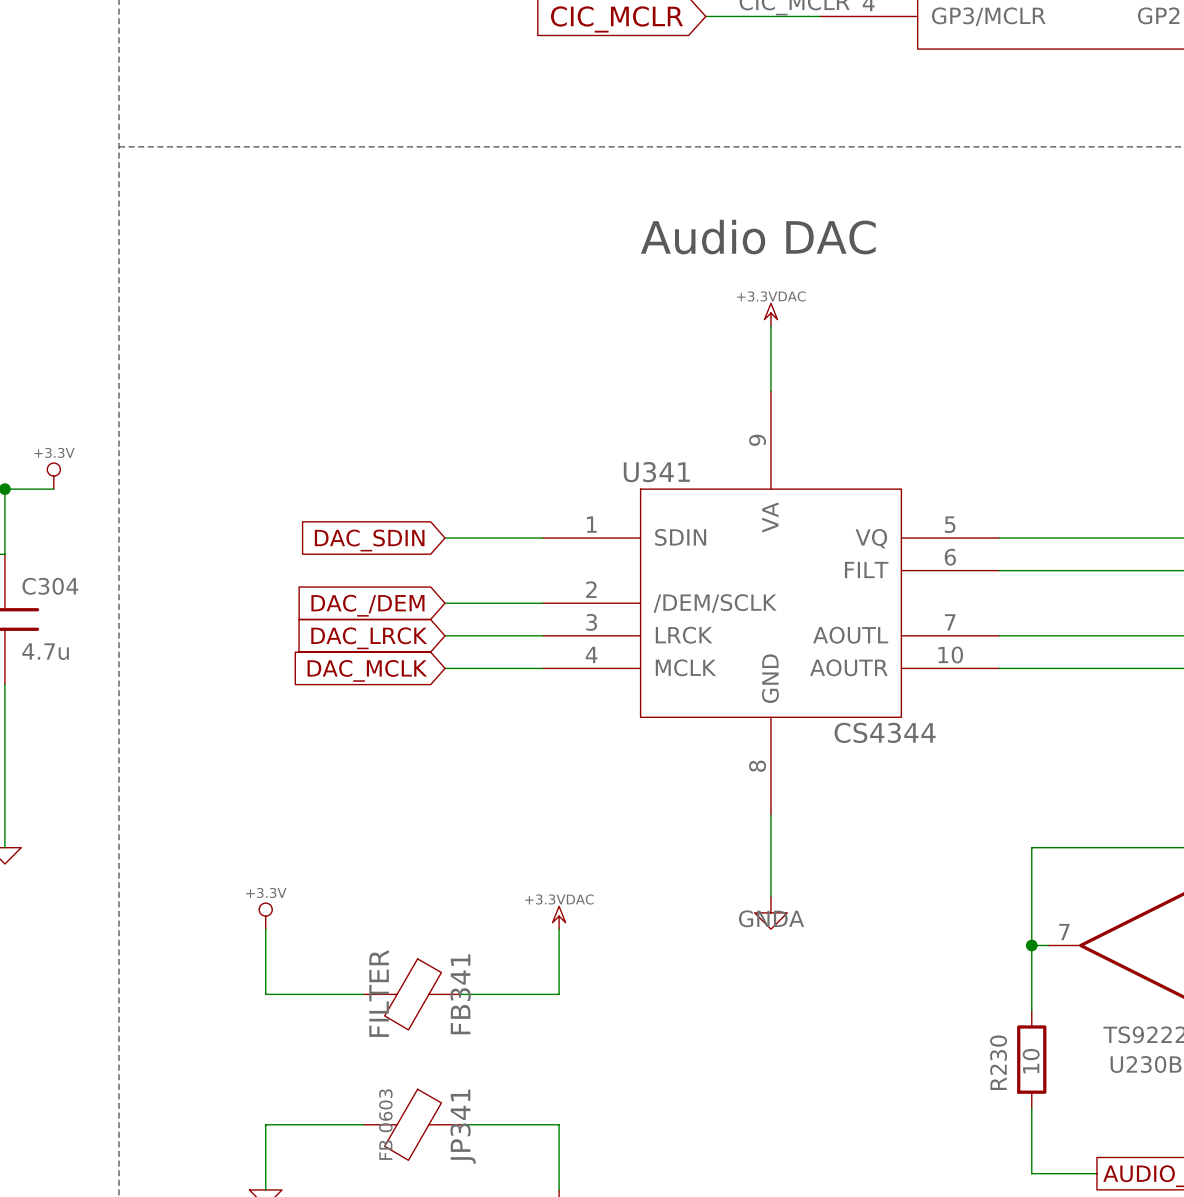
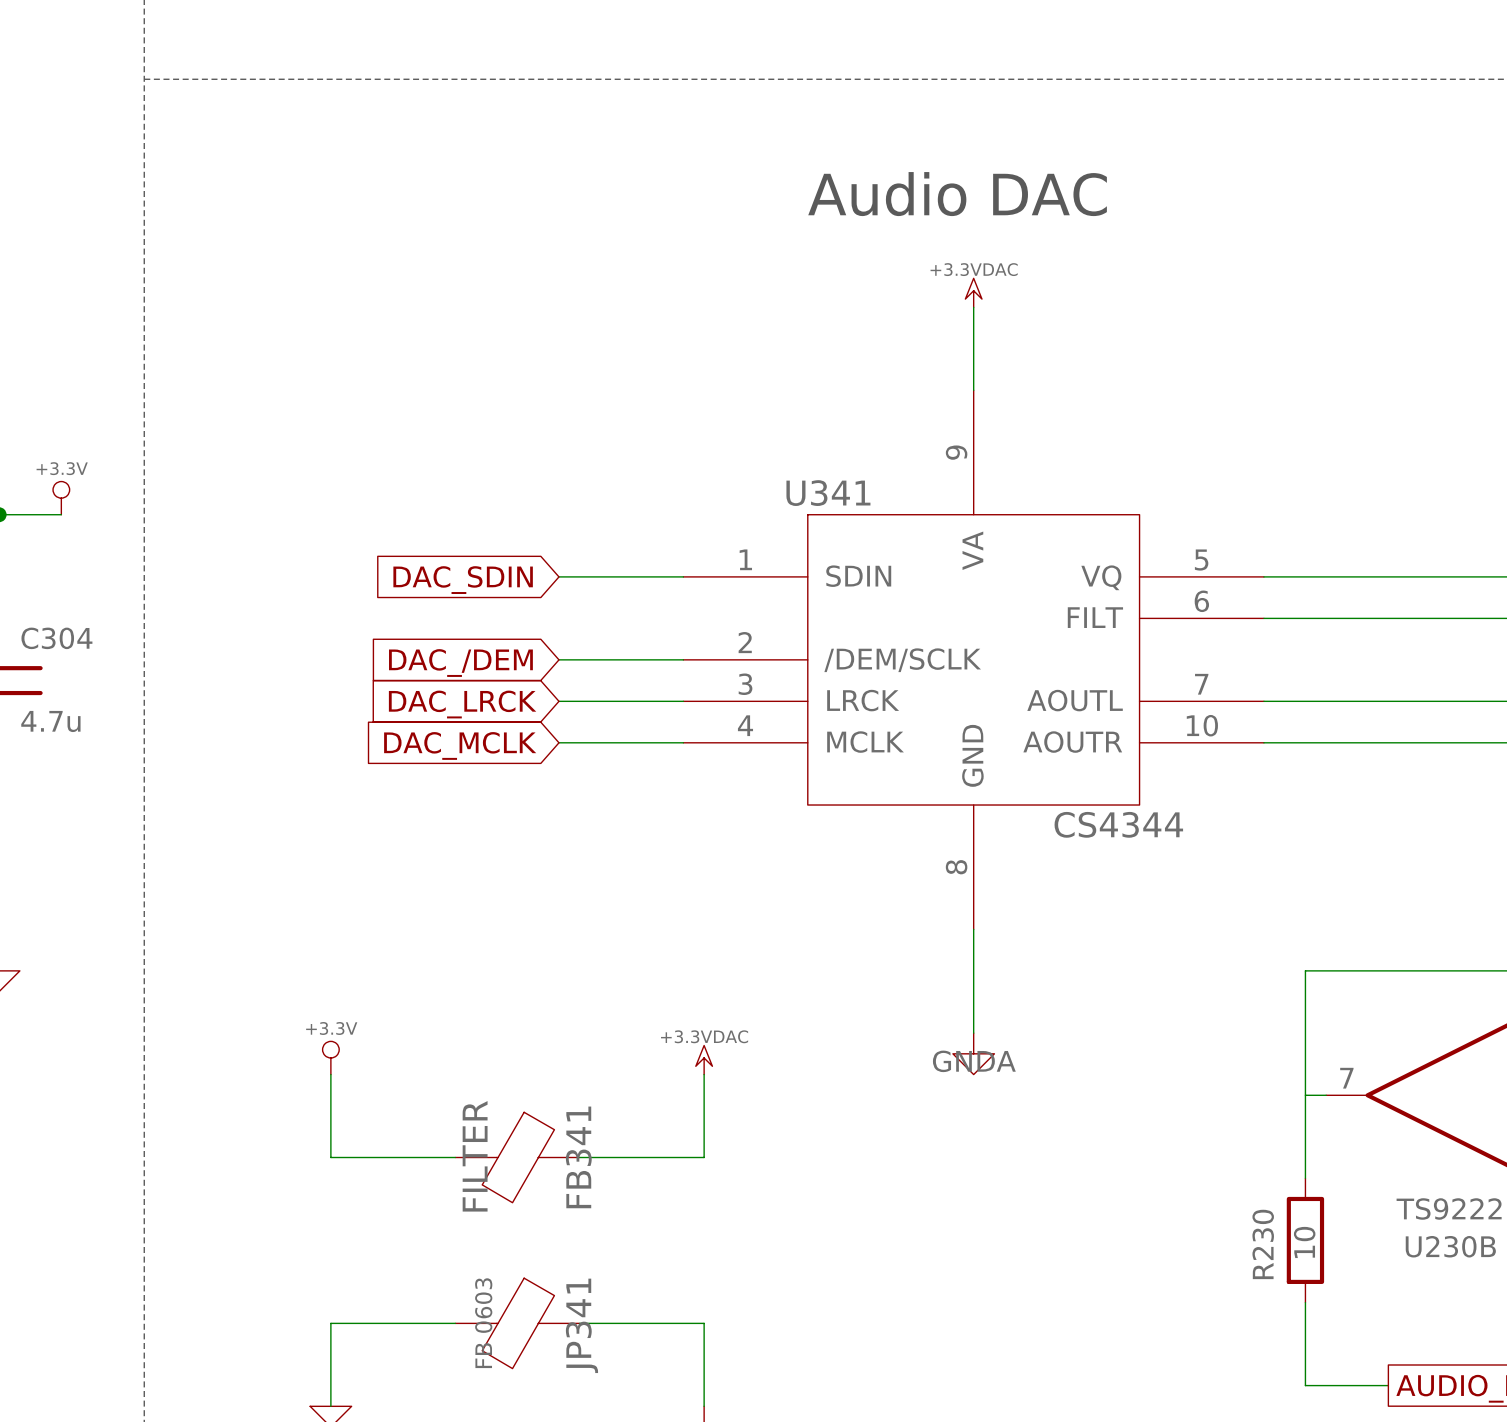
junction: (1031, 945) -> none

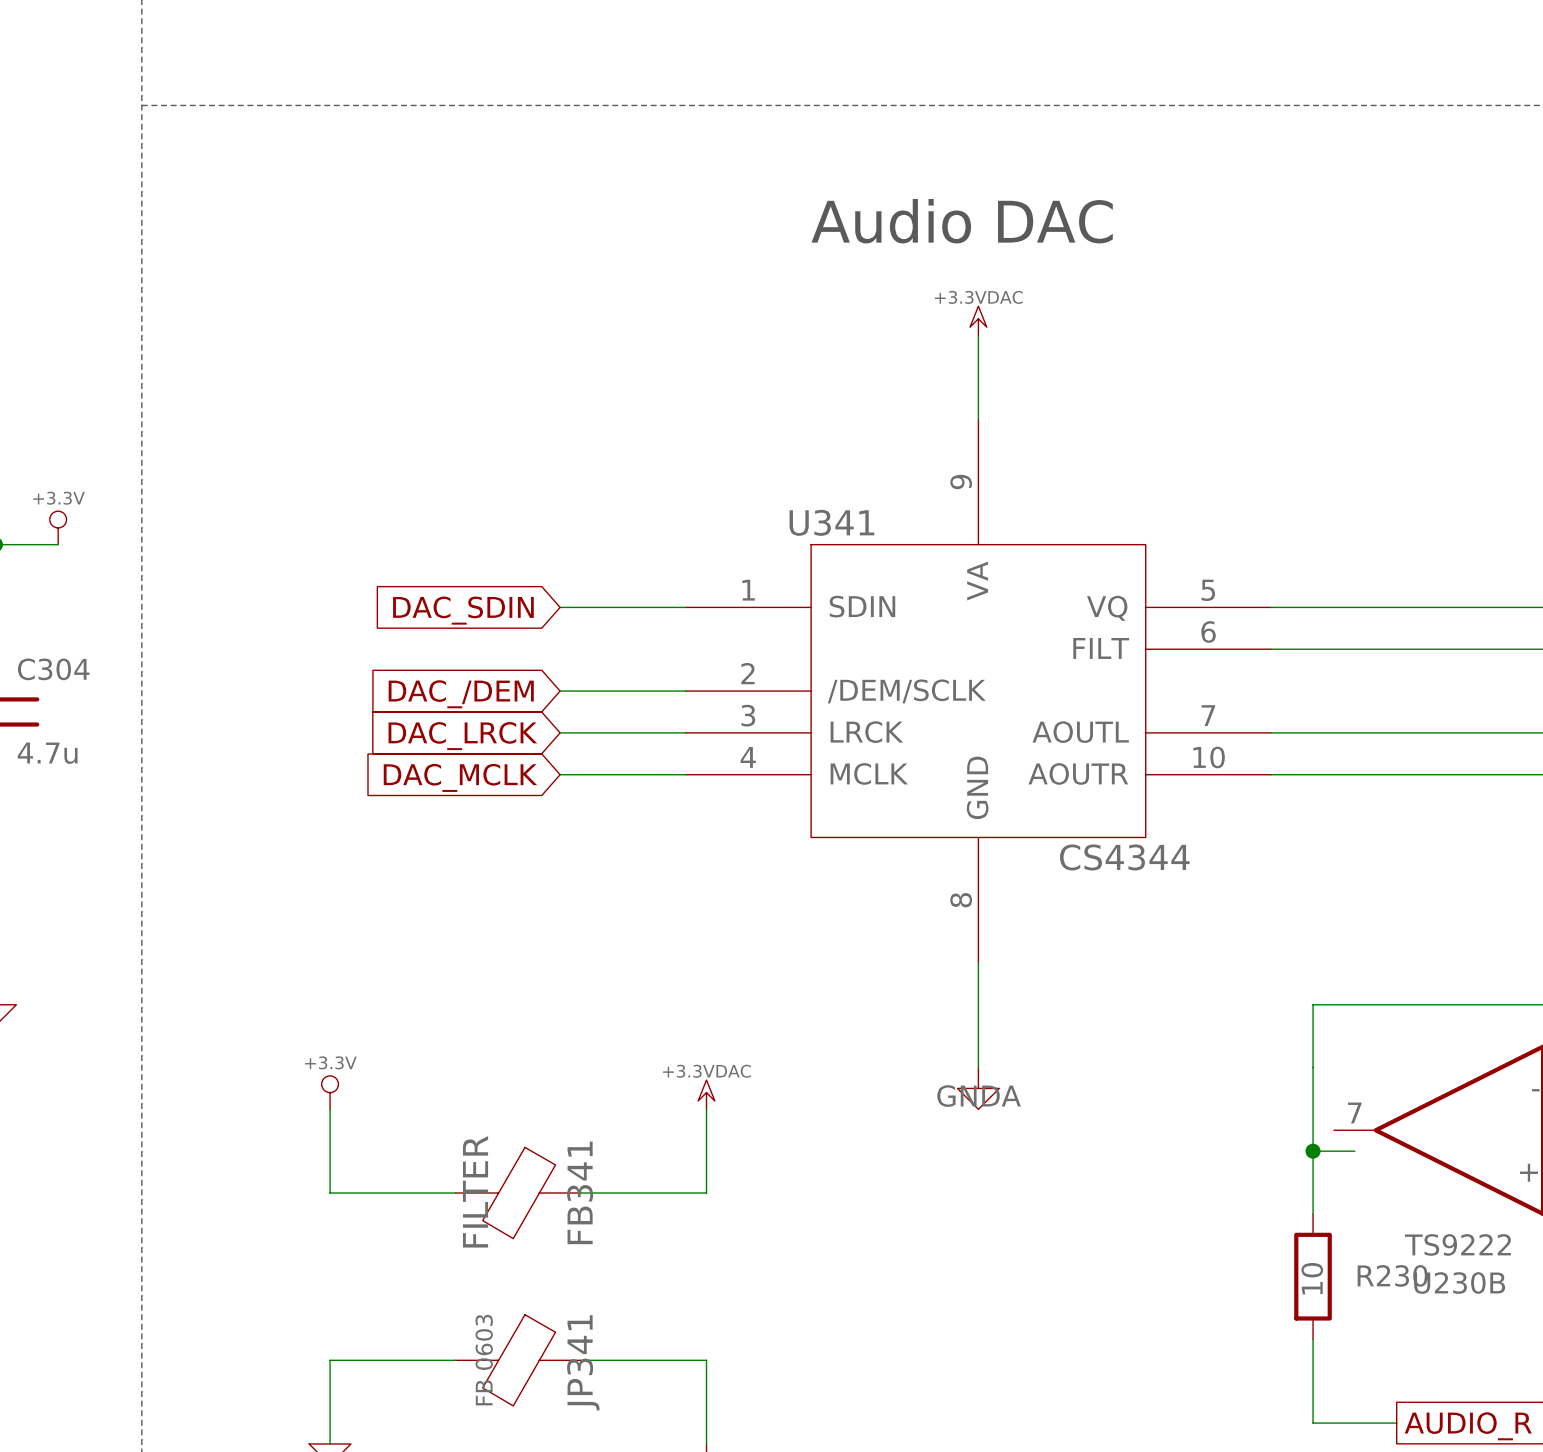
wire: (1305, 1095) (1326, 1095) -> none
wire: none -> (1313, 1151) (1354, 1151)
junction: none -> (1313, 1151)
R230 name rotation: 0° (1263, 1244) -> 90° clockwise (1392, 1275)
R230 name position: R230 (1263, 1244) -> R230 (1392, 1275)

